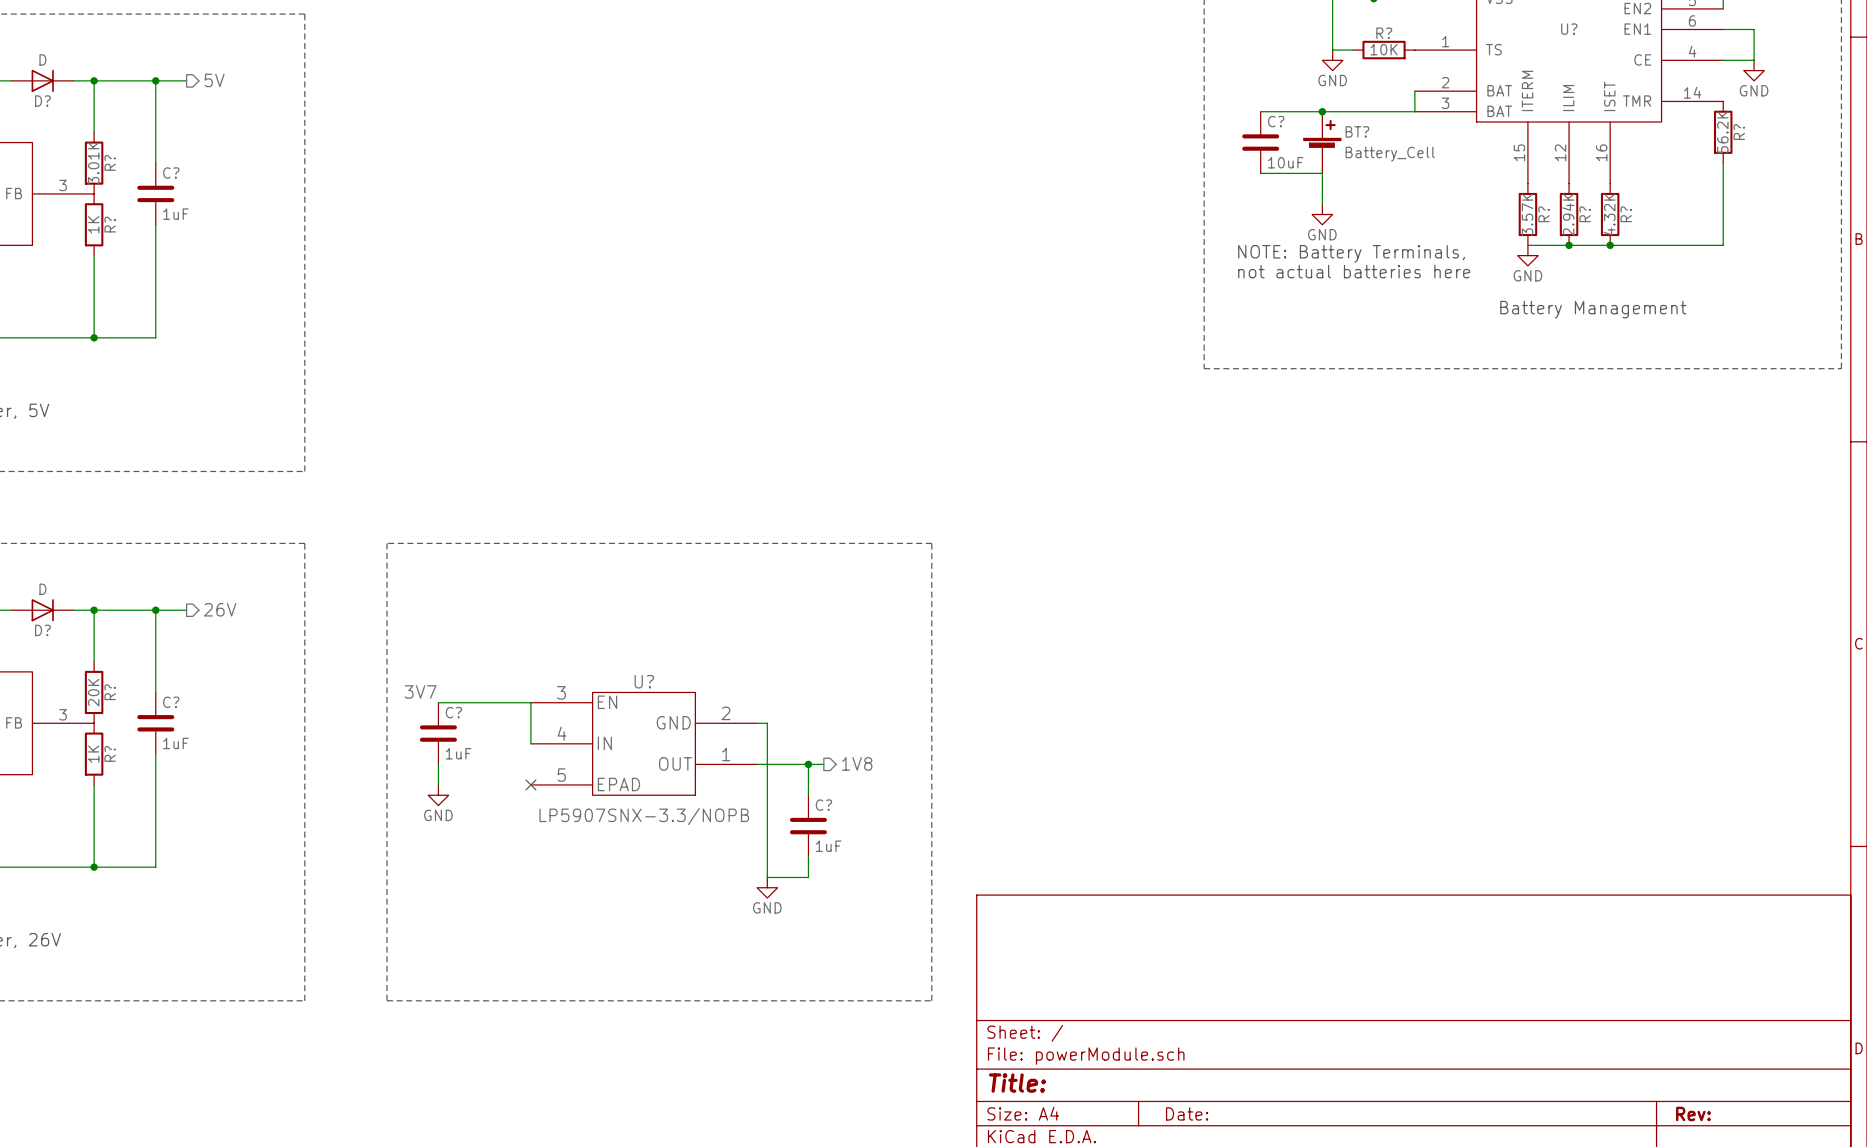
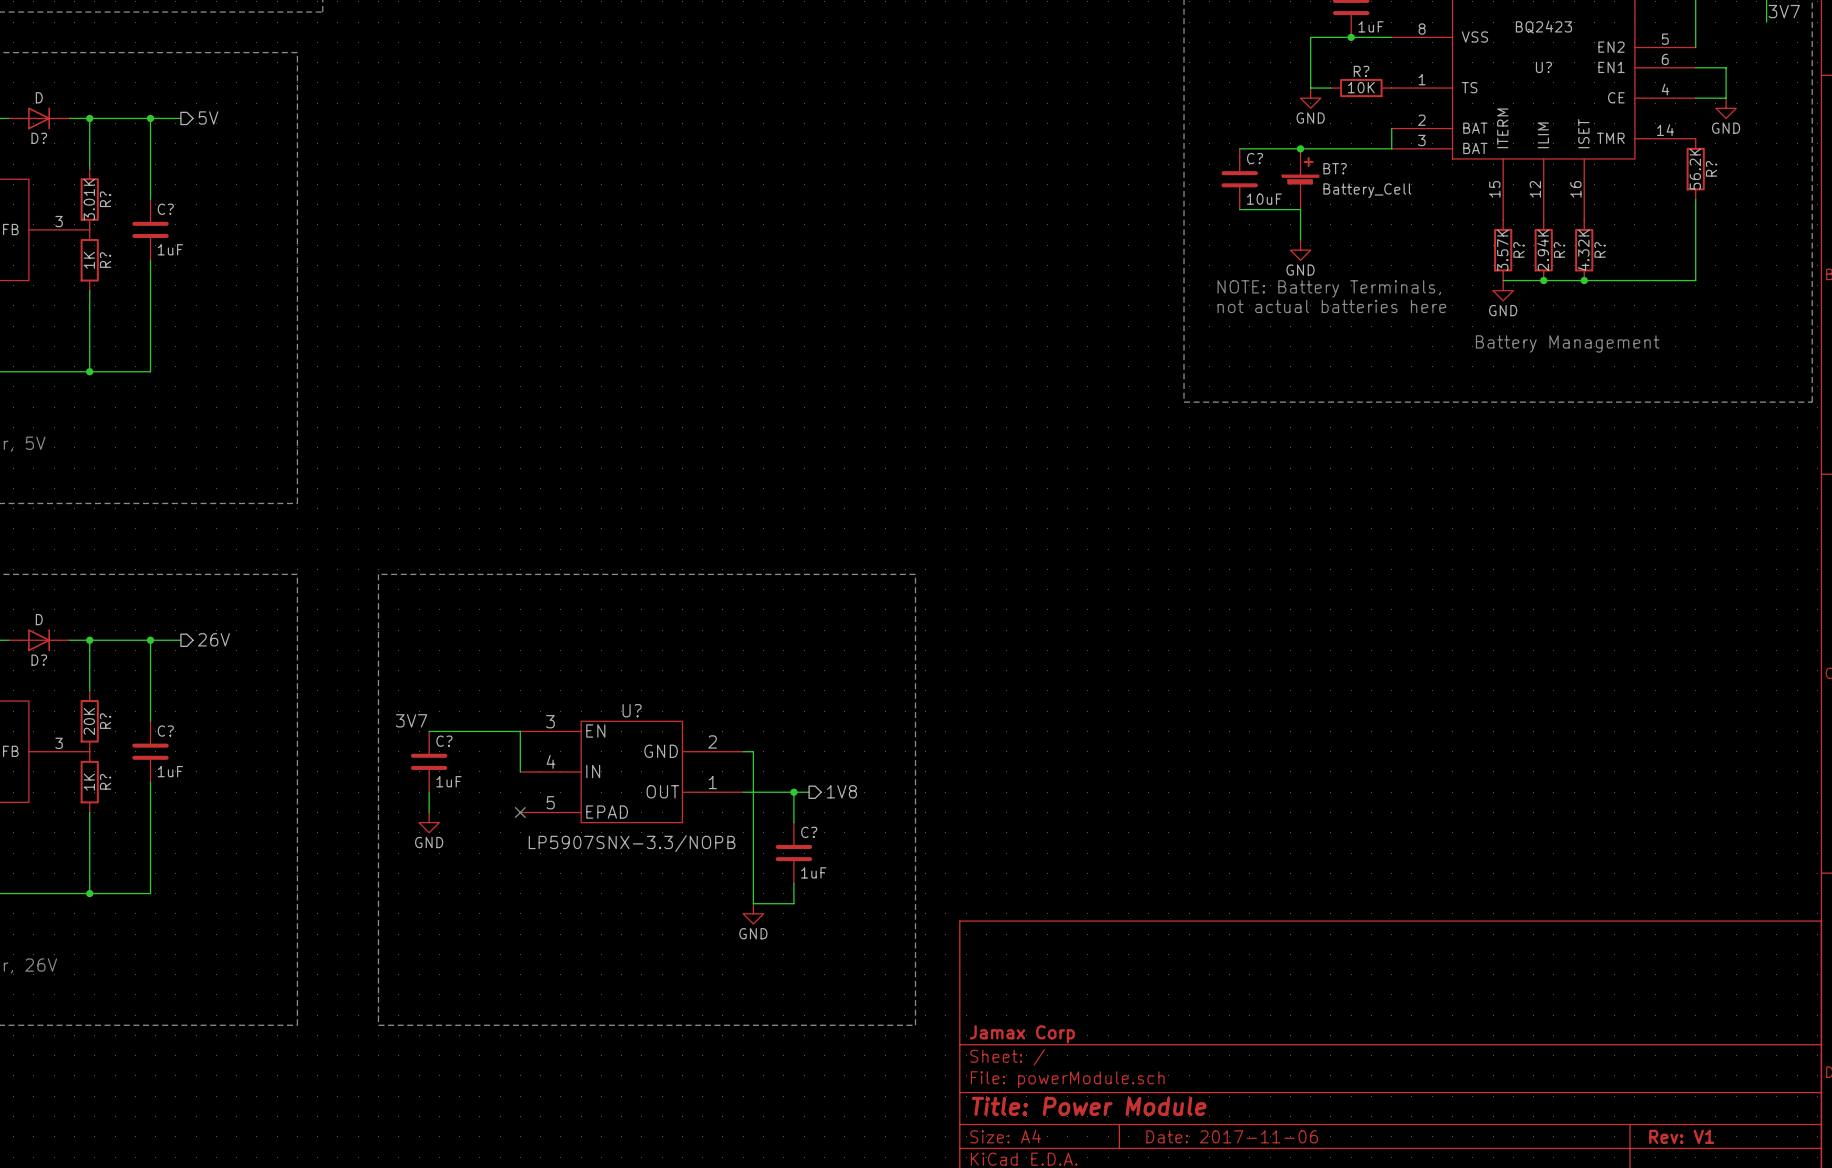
title block: none -> Jamax Corp (1022, 1034)
title block: Title: (1017, 1083) -> Title: Power Module (1089, 1106)
title block: Date: (1187, 1113) -> Date: 2017-11-06 (1232, 1136)
title block: Rev: (1693, 1113) -> Rev: V1 (1681, 1136)

